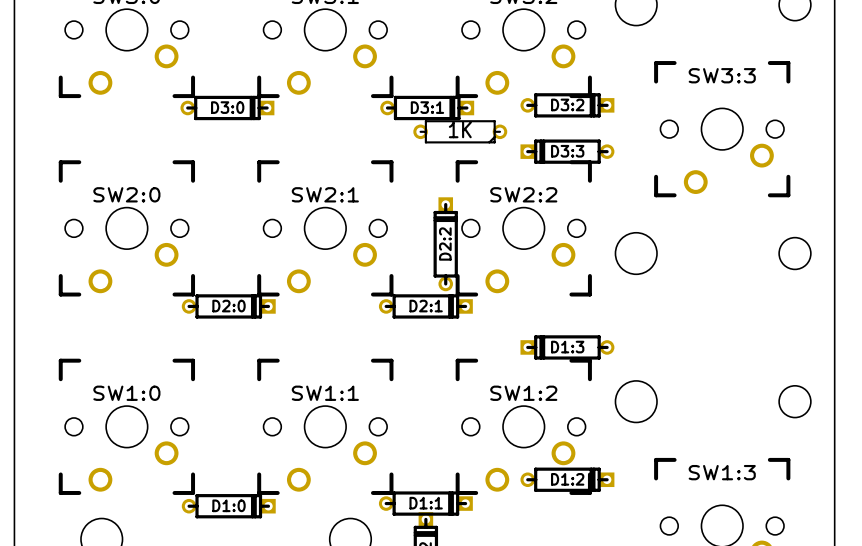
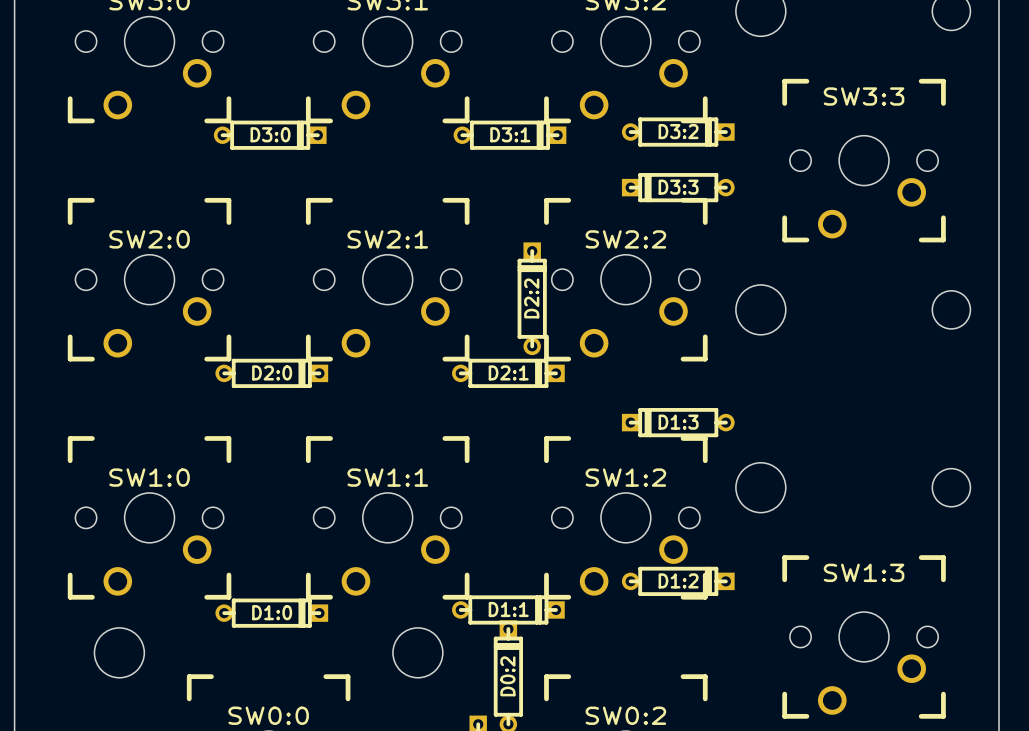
part: 1K (460, 131) -> none

